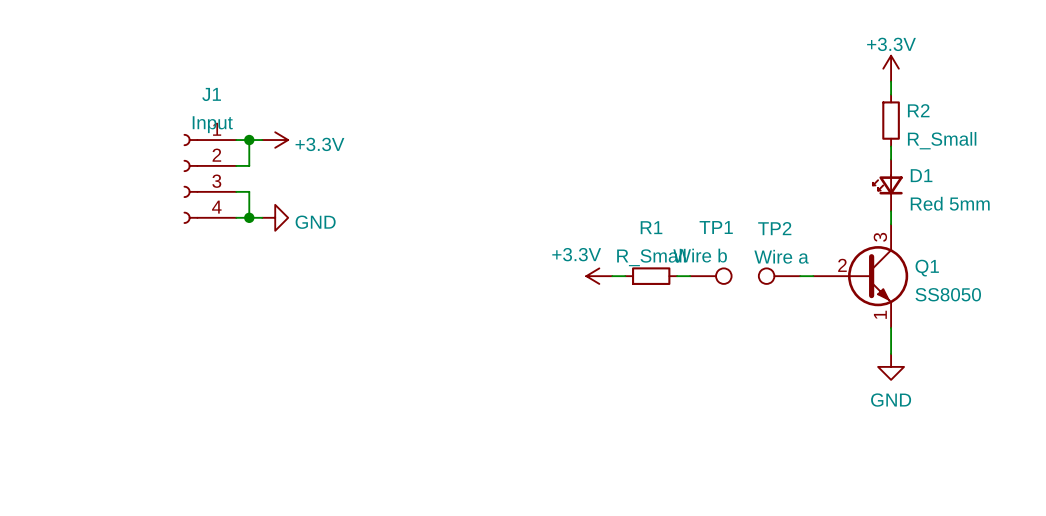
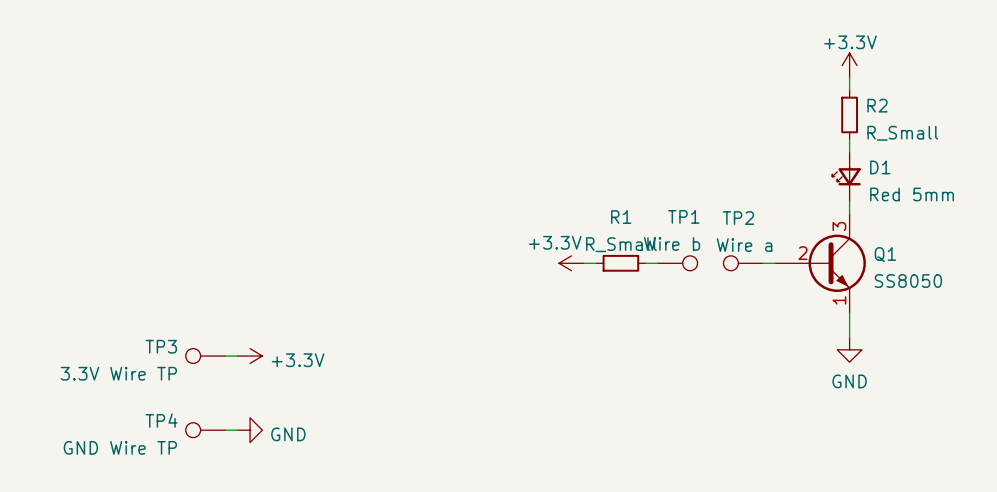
wire: (236, 140) (262, 140) -> none
wire: (249, 140) (249, 165) (236, 165) -> none
junction: (249, 140) -> none
power symbol position: +3.3V (275, 140) -> +3.3V (250, 356)
J1: Input (209, 178) -> none
wire: (236, 191) (249, 191) (249, 217) -> none
wire: (236, 217) (262, 217) -> none
junction: (249, 217) -> none
power symbol position: GND (275, 217) -> GND (250, 430)
TP3: none -> 3.3V Wire TP (205, 356)
wire: none -> (225, 356) (237, 356)
TP4: none -> GND Wire TP (205, 430)
wire: none -> (225, 430) (237, 430)

